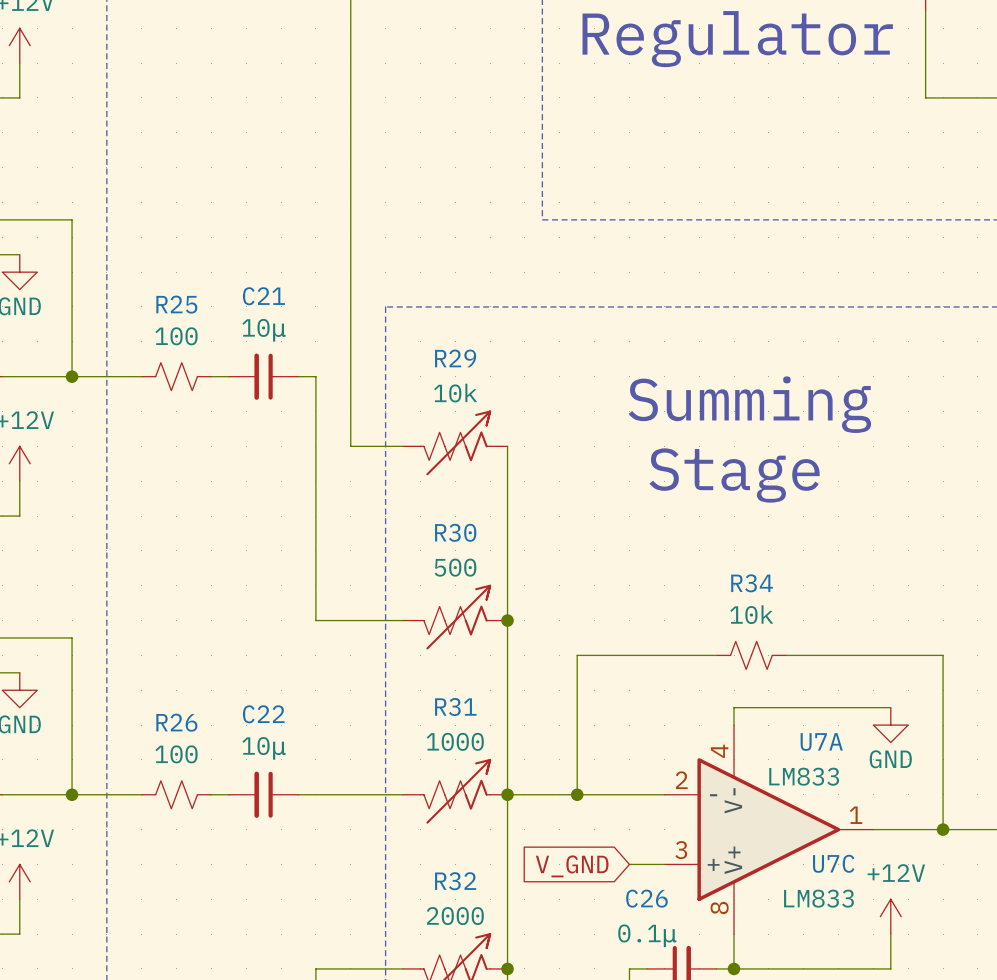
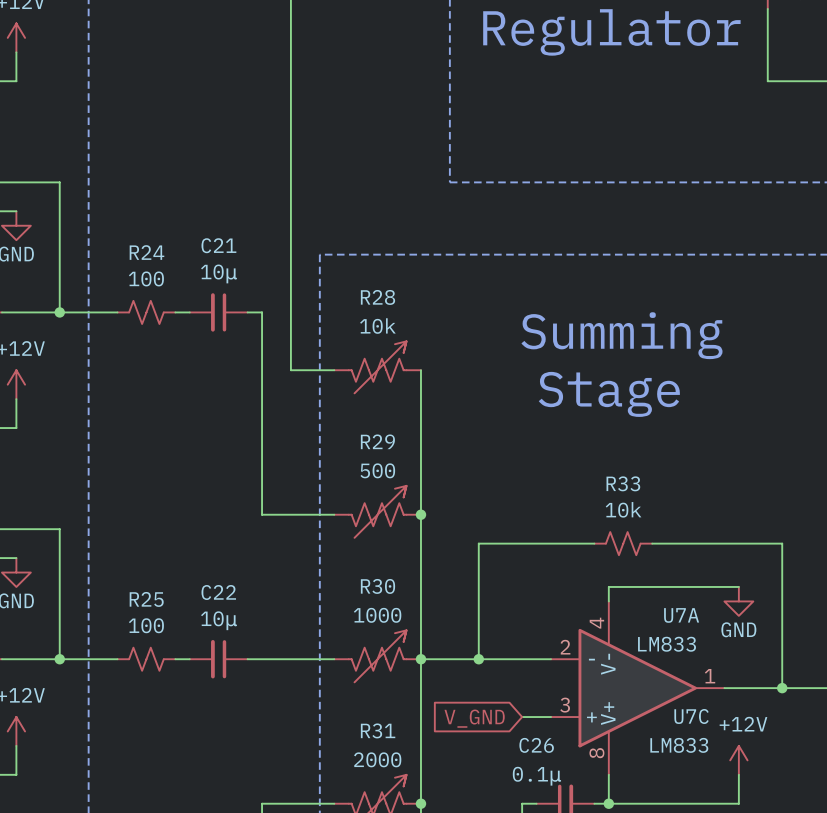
R25 name: R25 (176, 304) -> R24 (146, 252)
R29 name: R29 (455, 358) -> R28 (377, 297)
R30 name: R30 (455, 532) -> R29 (377, 441)
R34 name: R34 (752, 583) -> R33 (623, 483)
R31 name: R31 (455, 707) -> R30 (377, 586)
R26 name: R26 (176, 722) -> R25 (146, 599)
R32 name: R32 (455, 881) -> R31 (378, 730)

